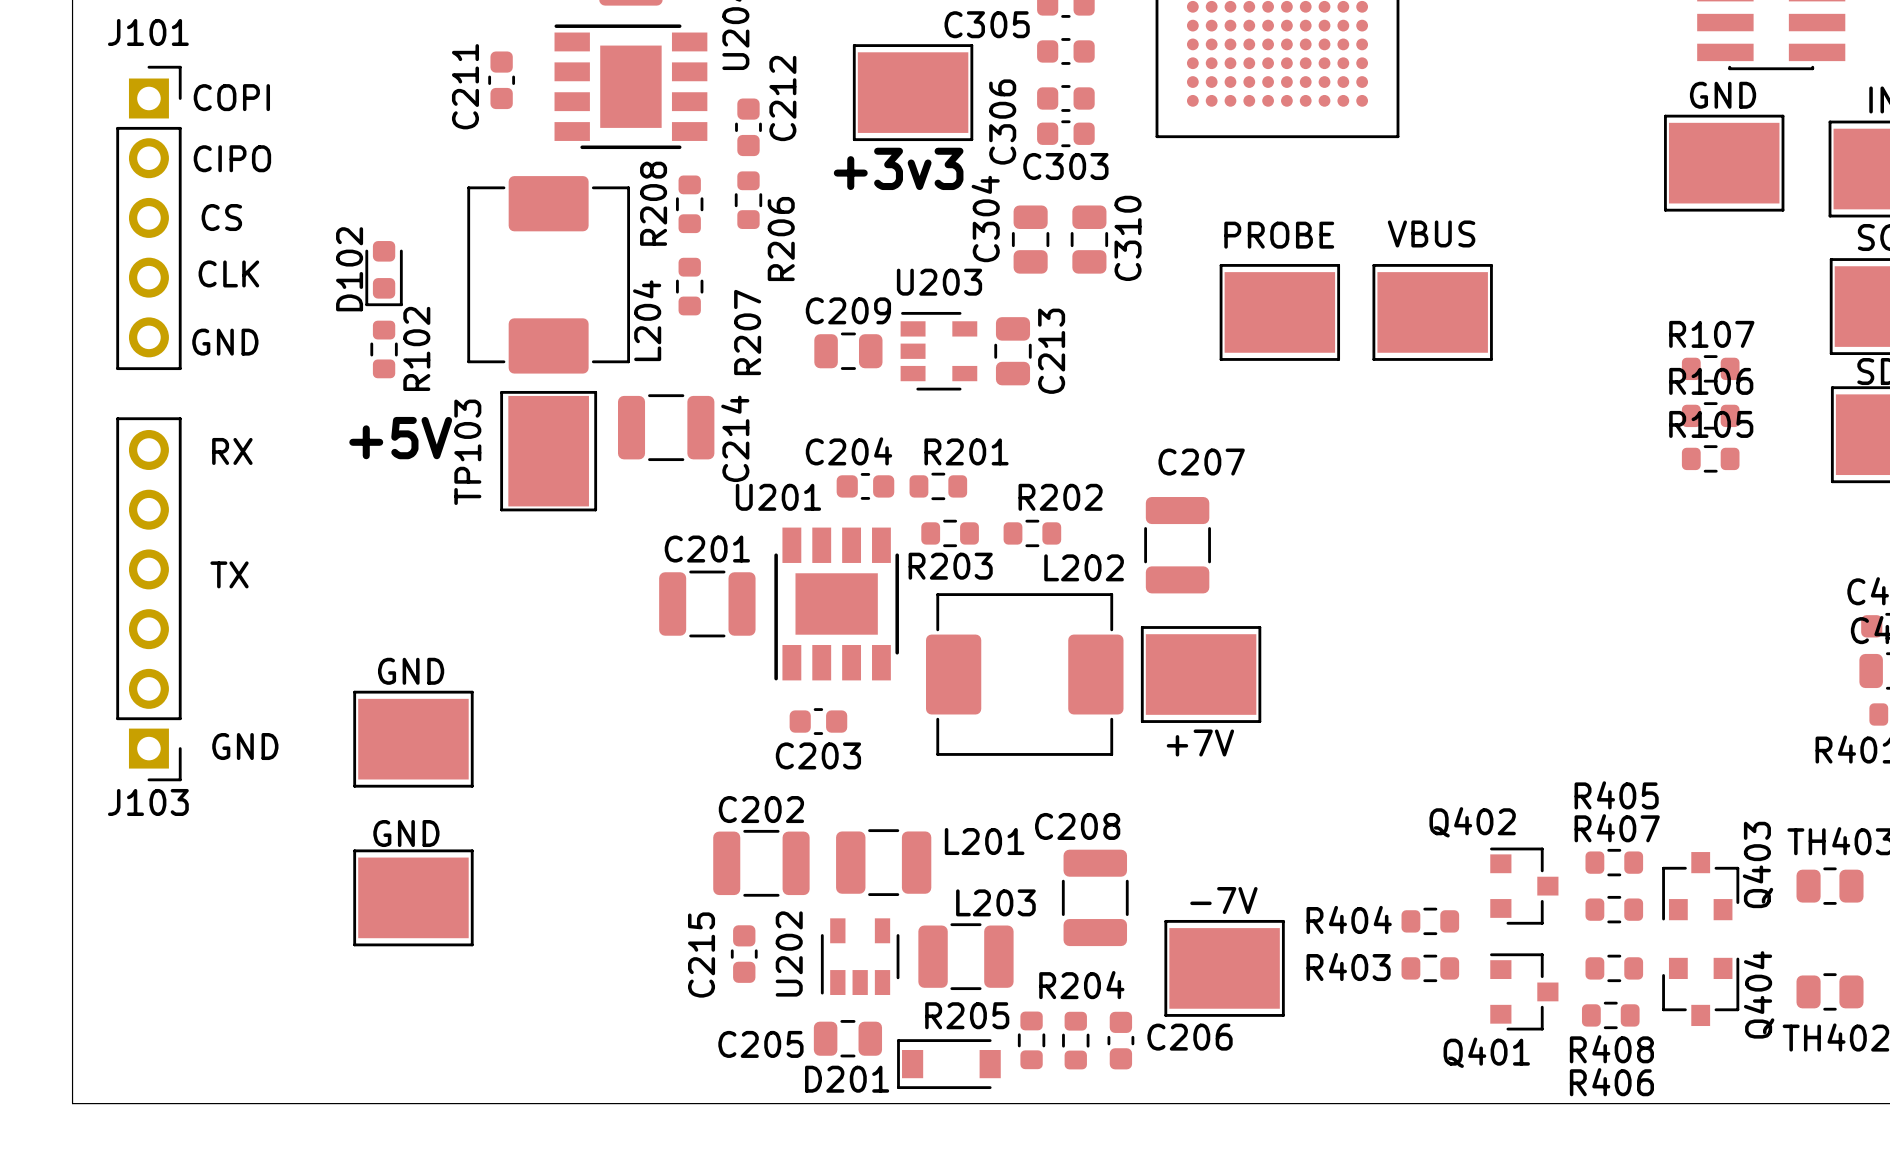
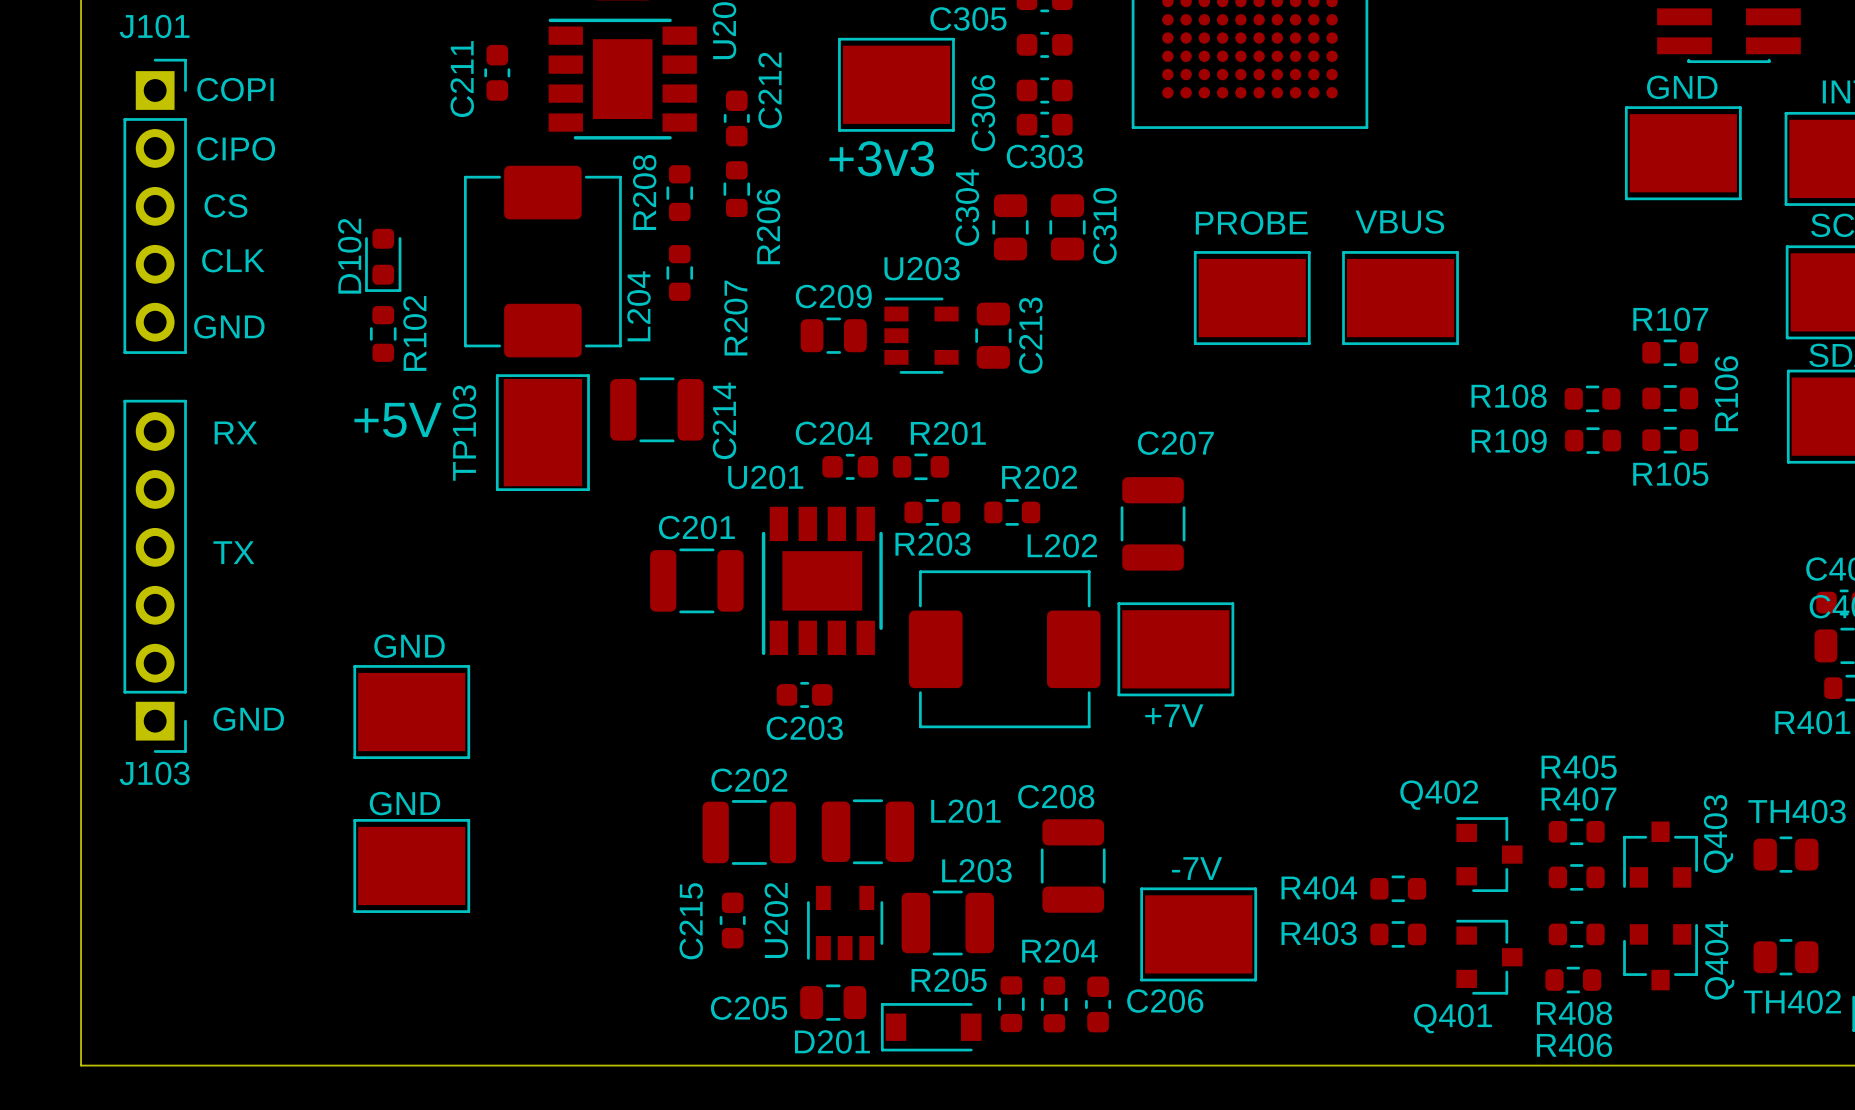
R106 name rotation: 0° (1711, 381) -> 90° counterclockwise (1726, 393)
R108: none -> (1592, 398)
R105 name position: R105 (1711, 424) -> R105 (1670, 474)
R109: none -> (1593, 440)

